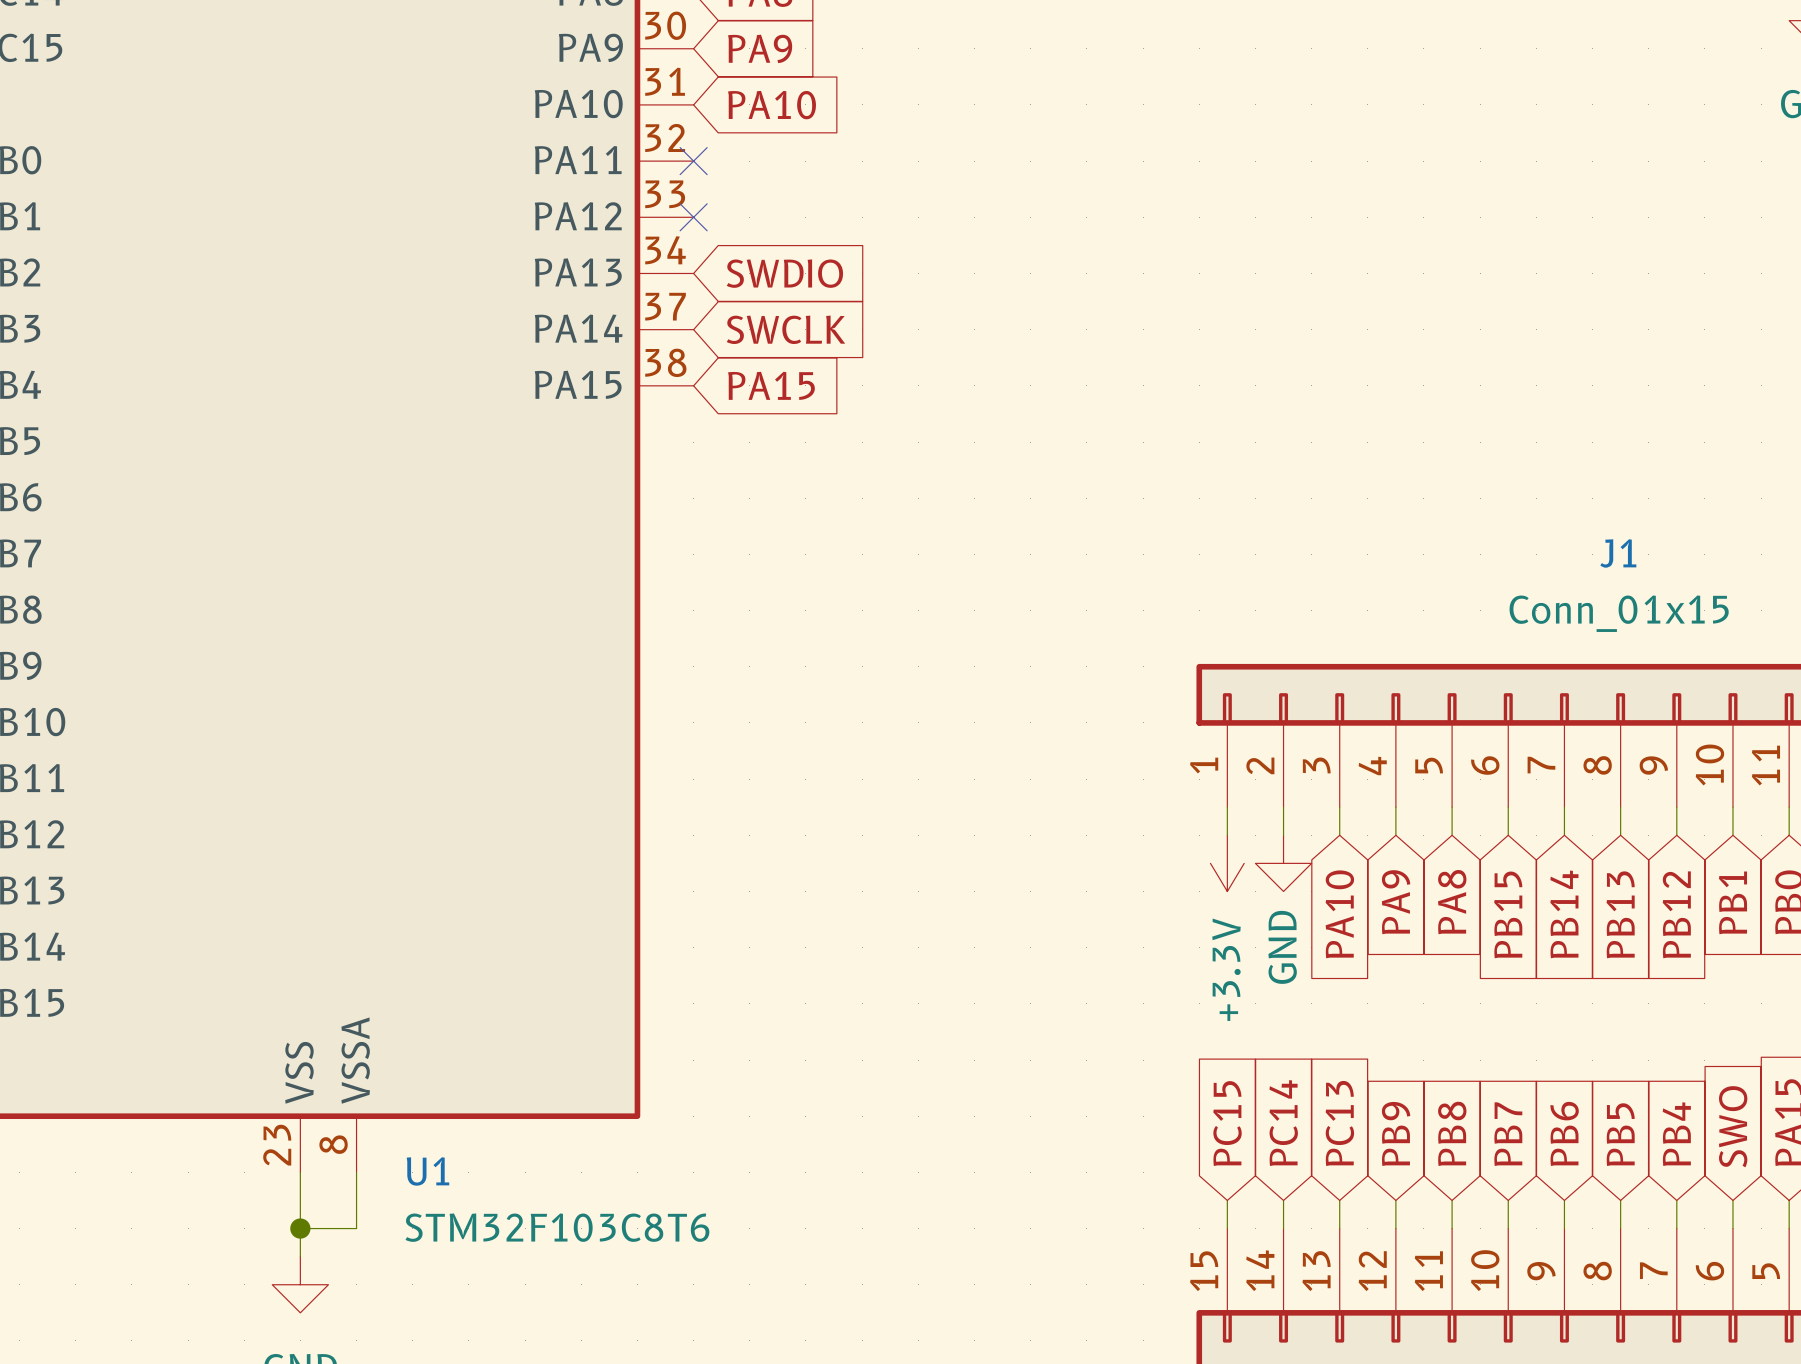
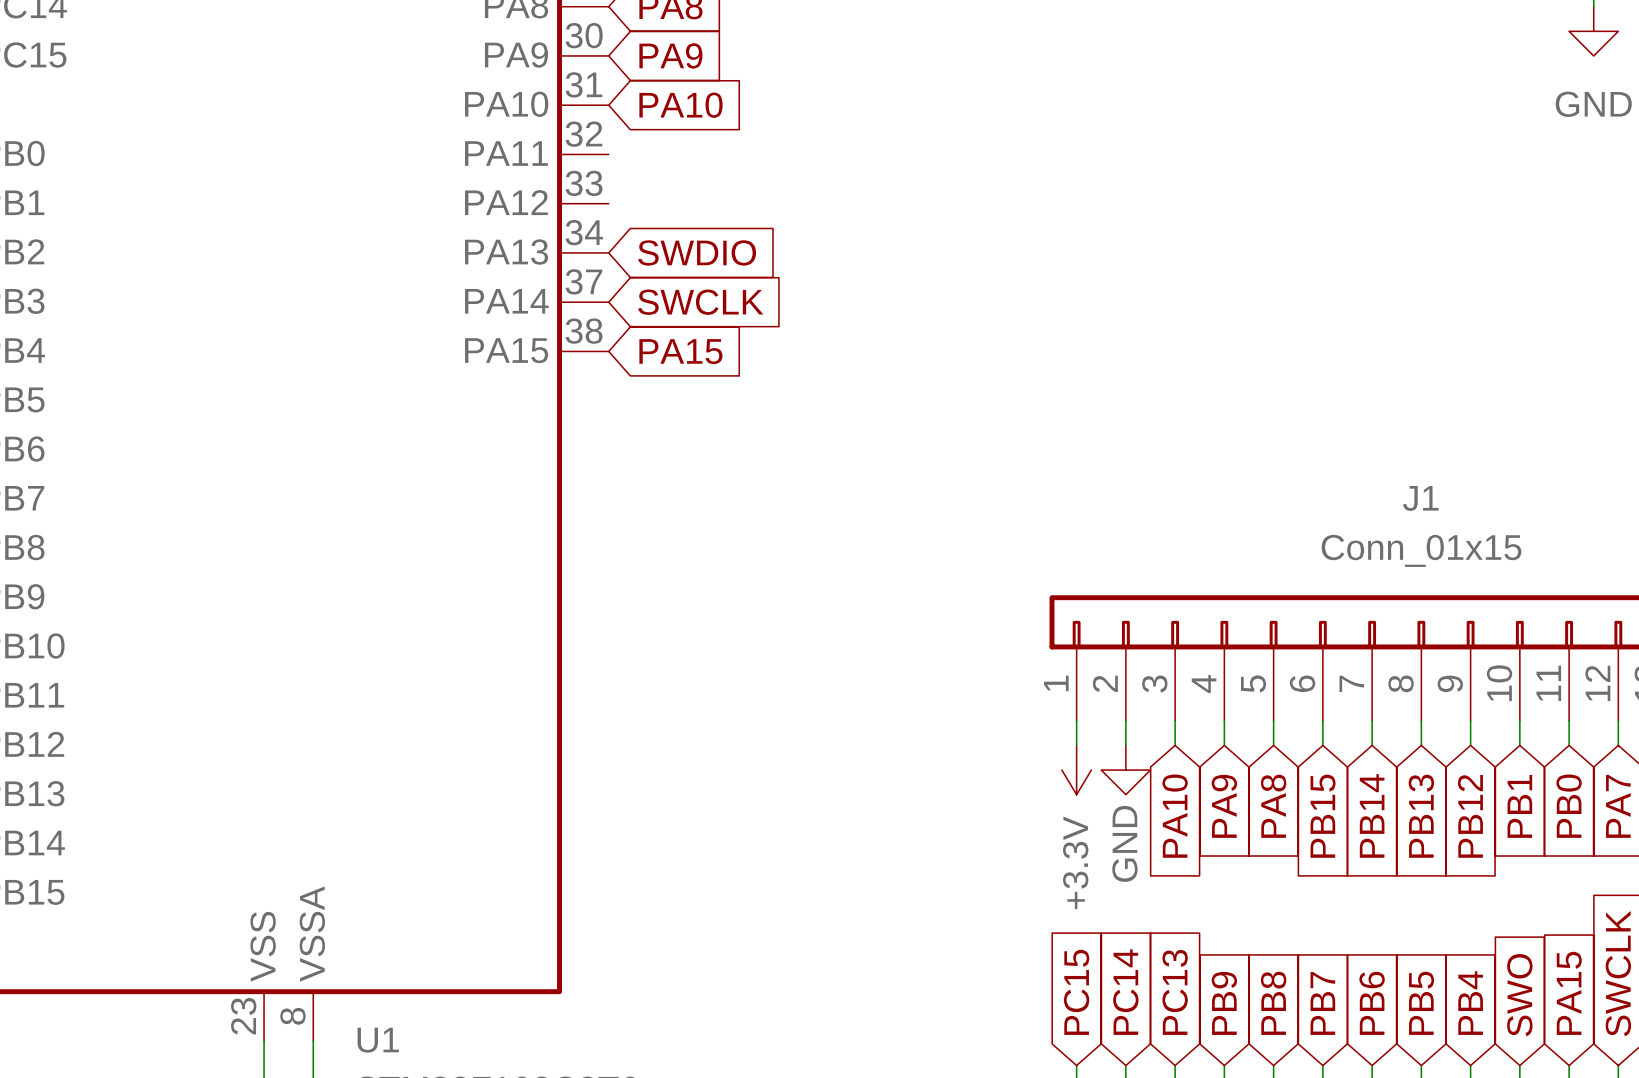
no-connect mark: (693, 161) -> none
no-connect mark: (693, 217) -> none

